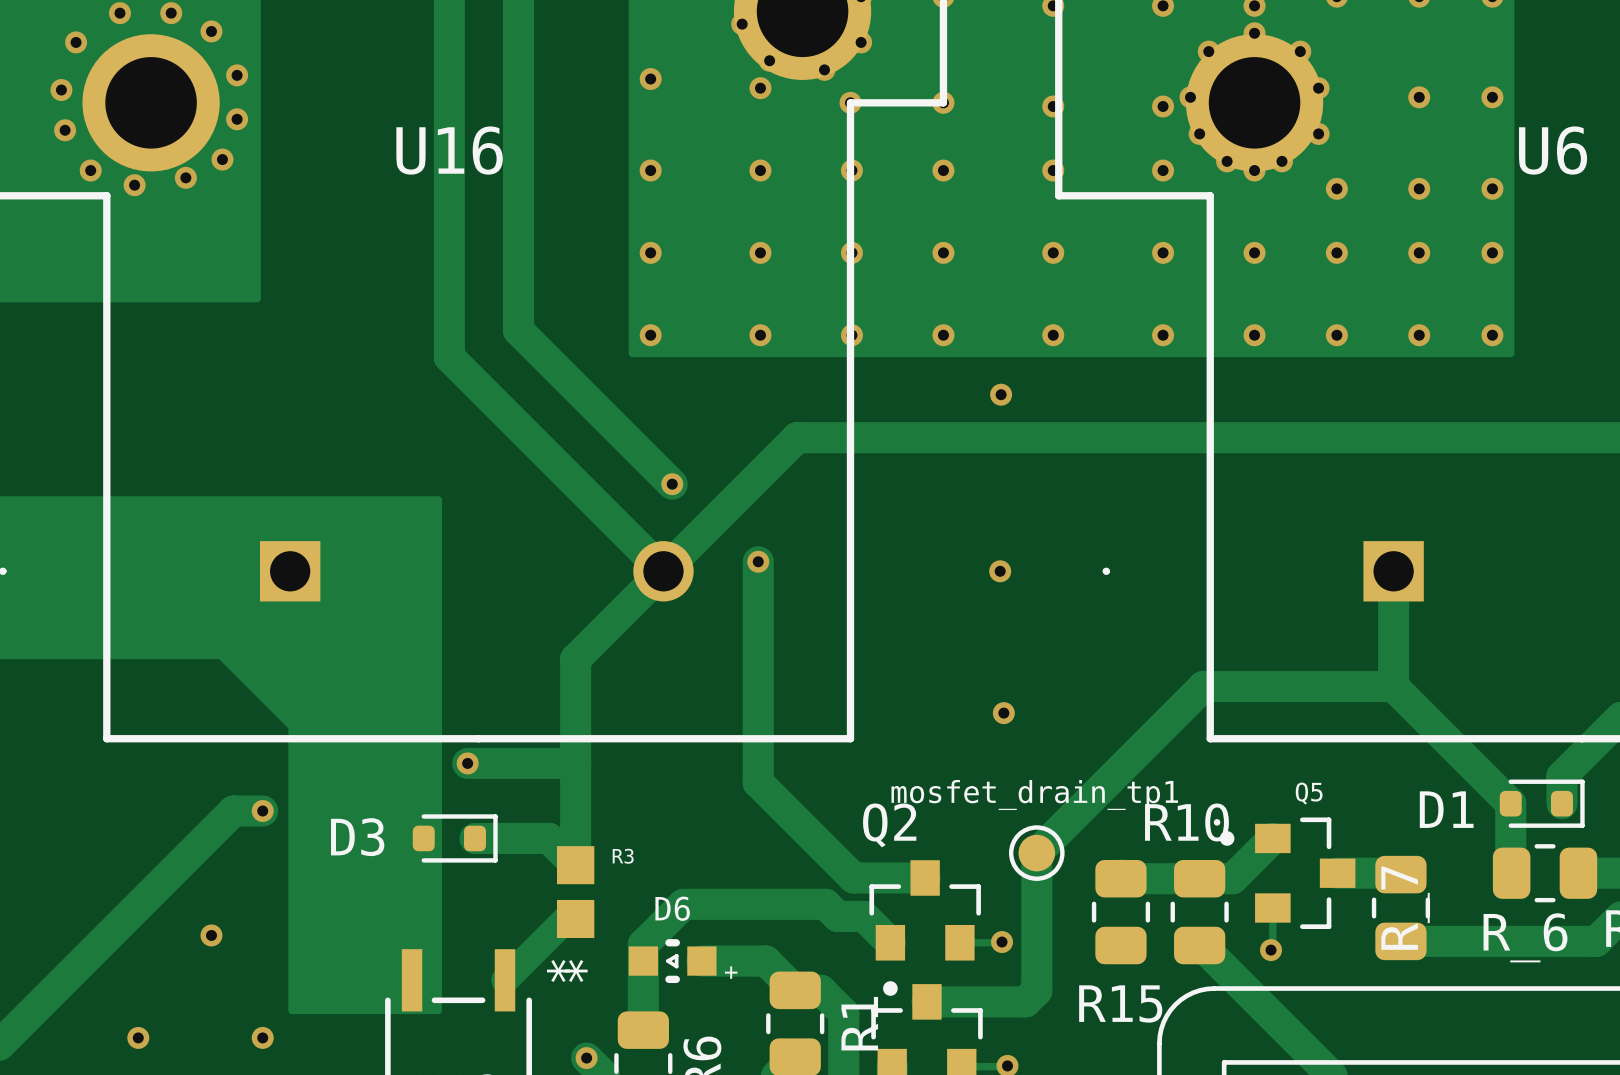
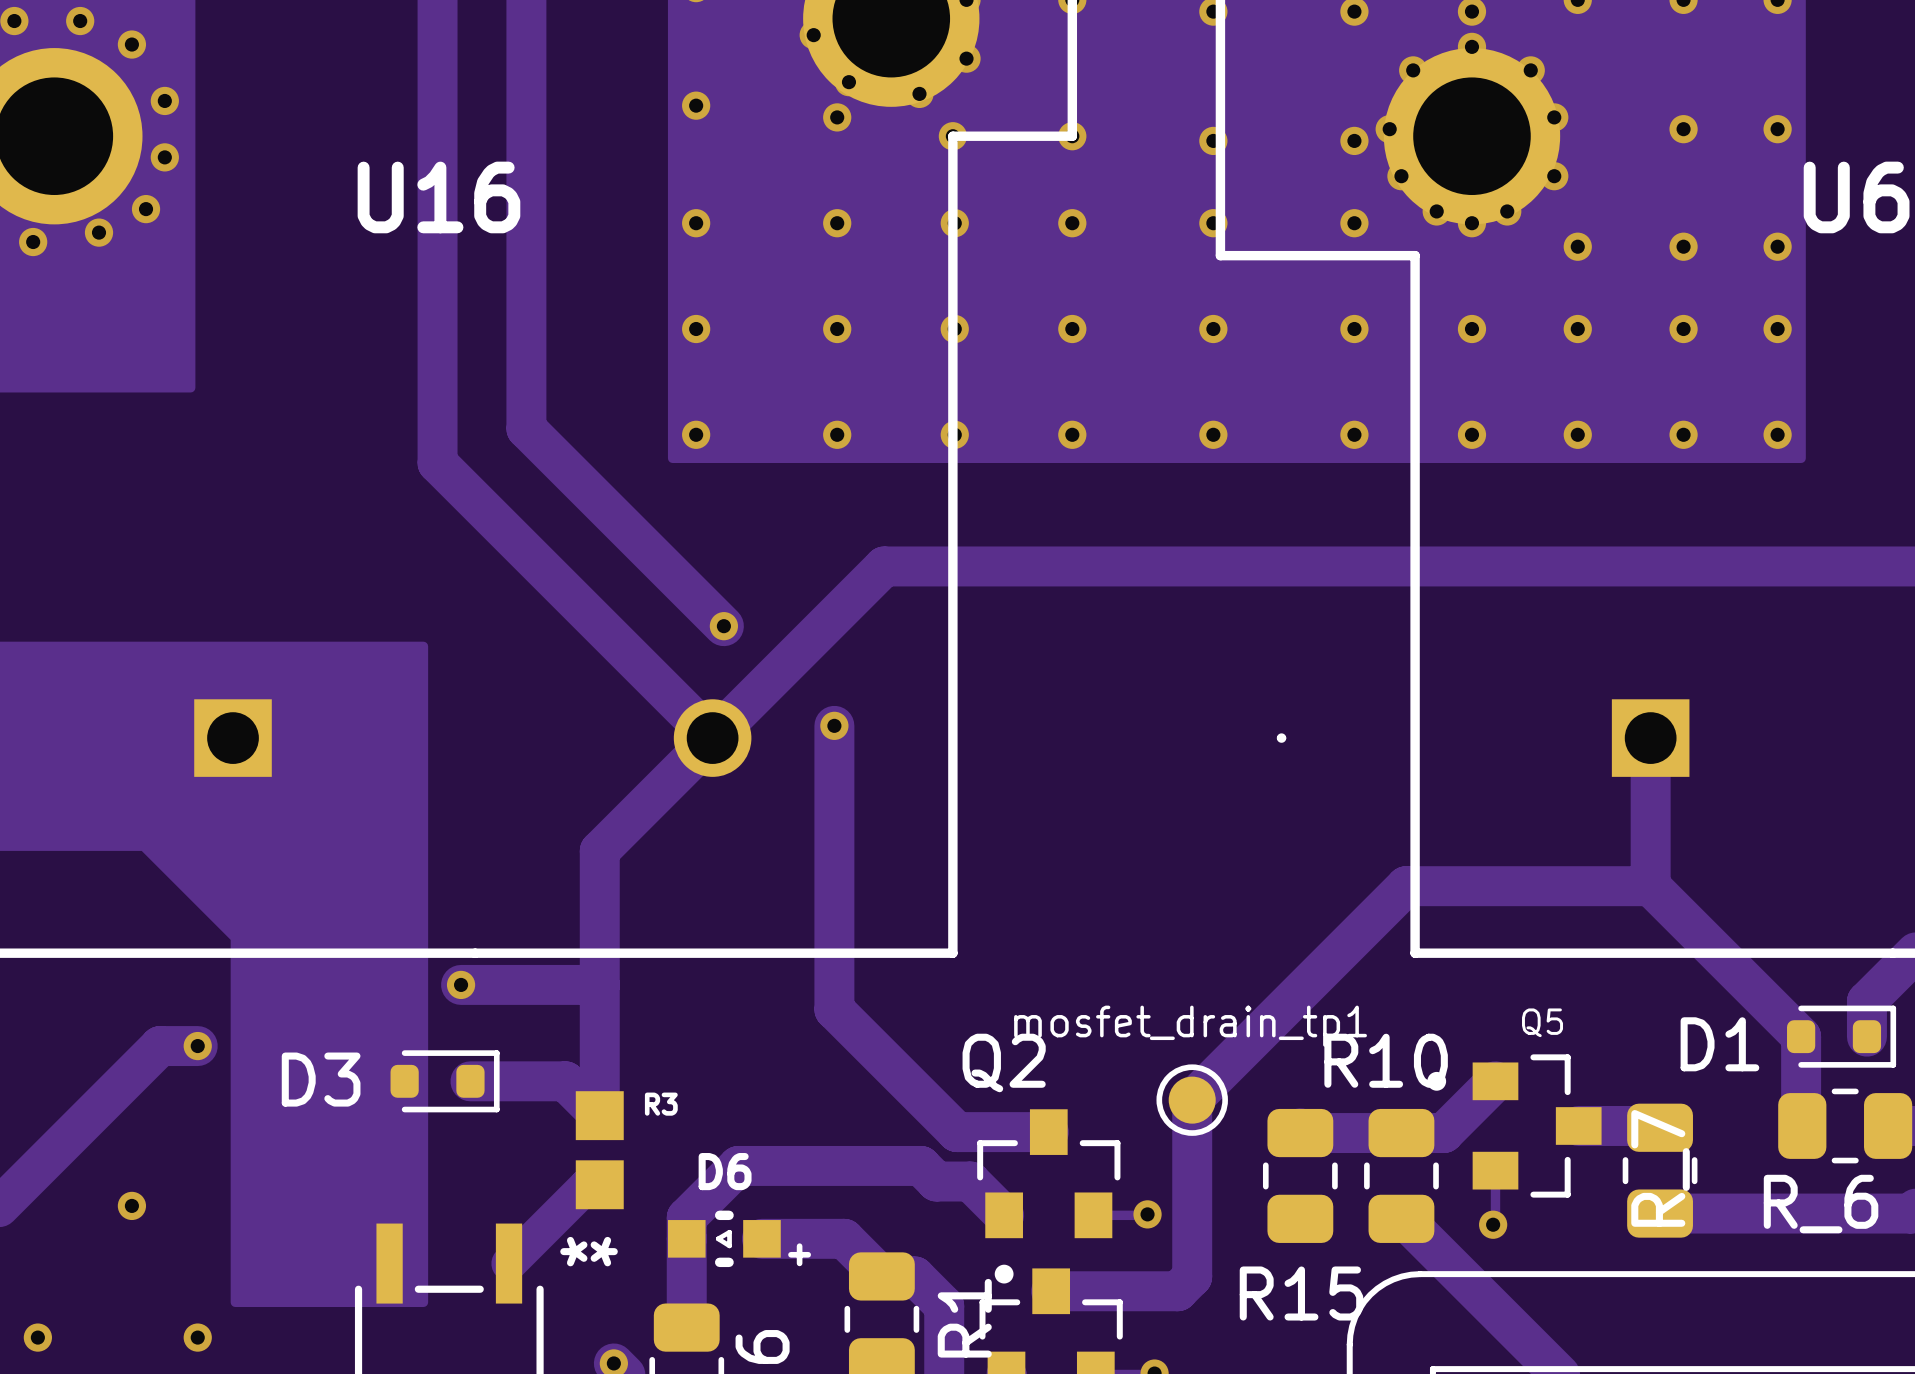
via: (1001, 394) -> none
via: (1000, 571) -> none
via: (1003, 713) -> none

